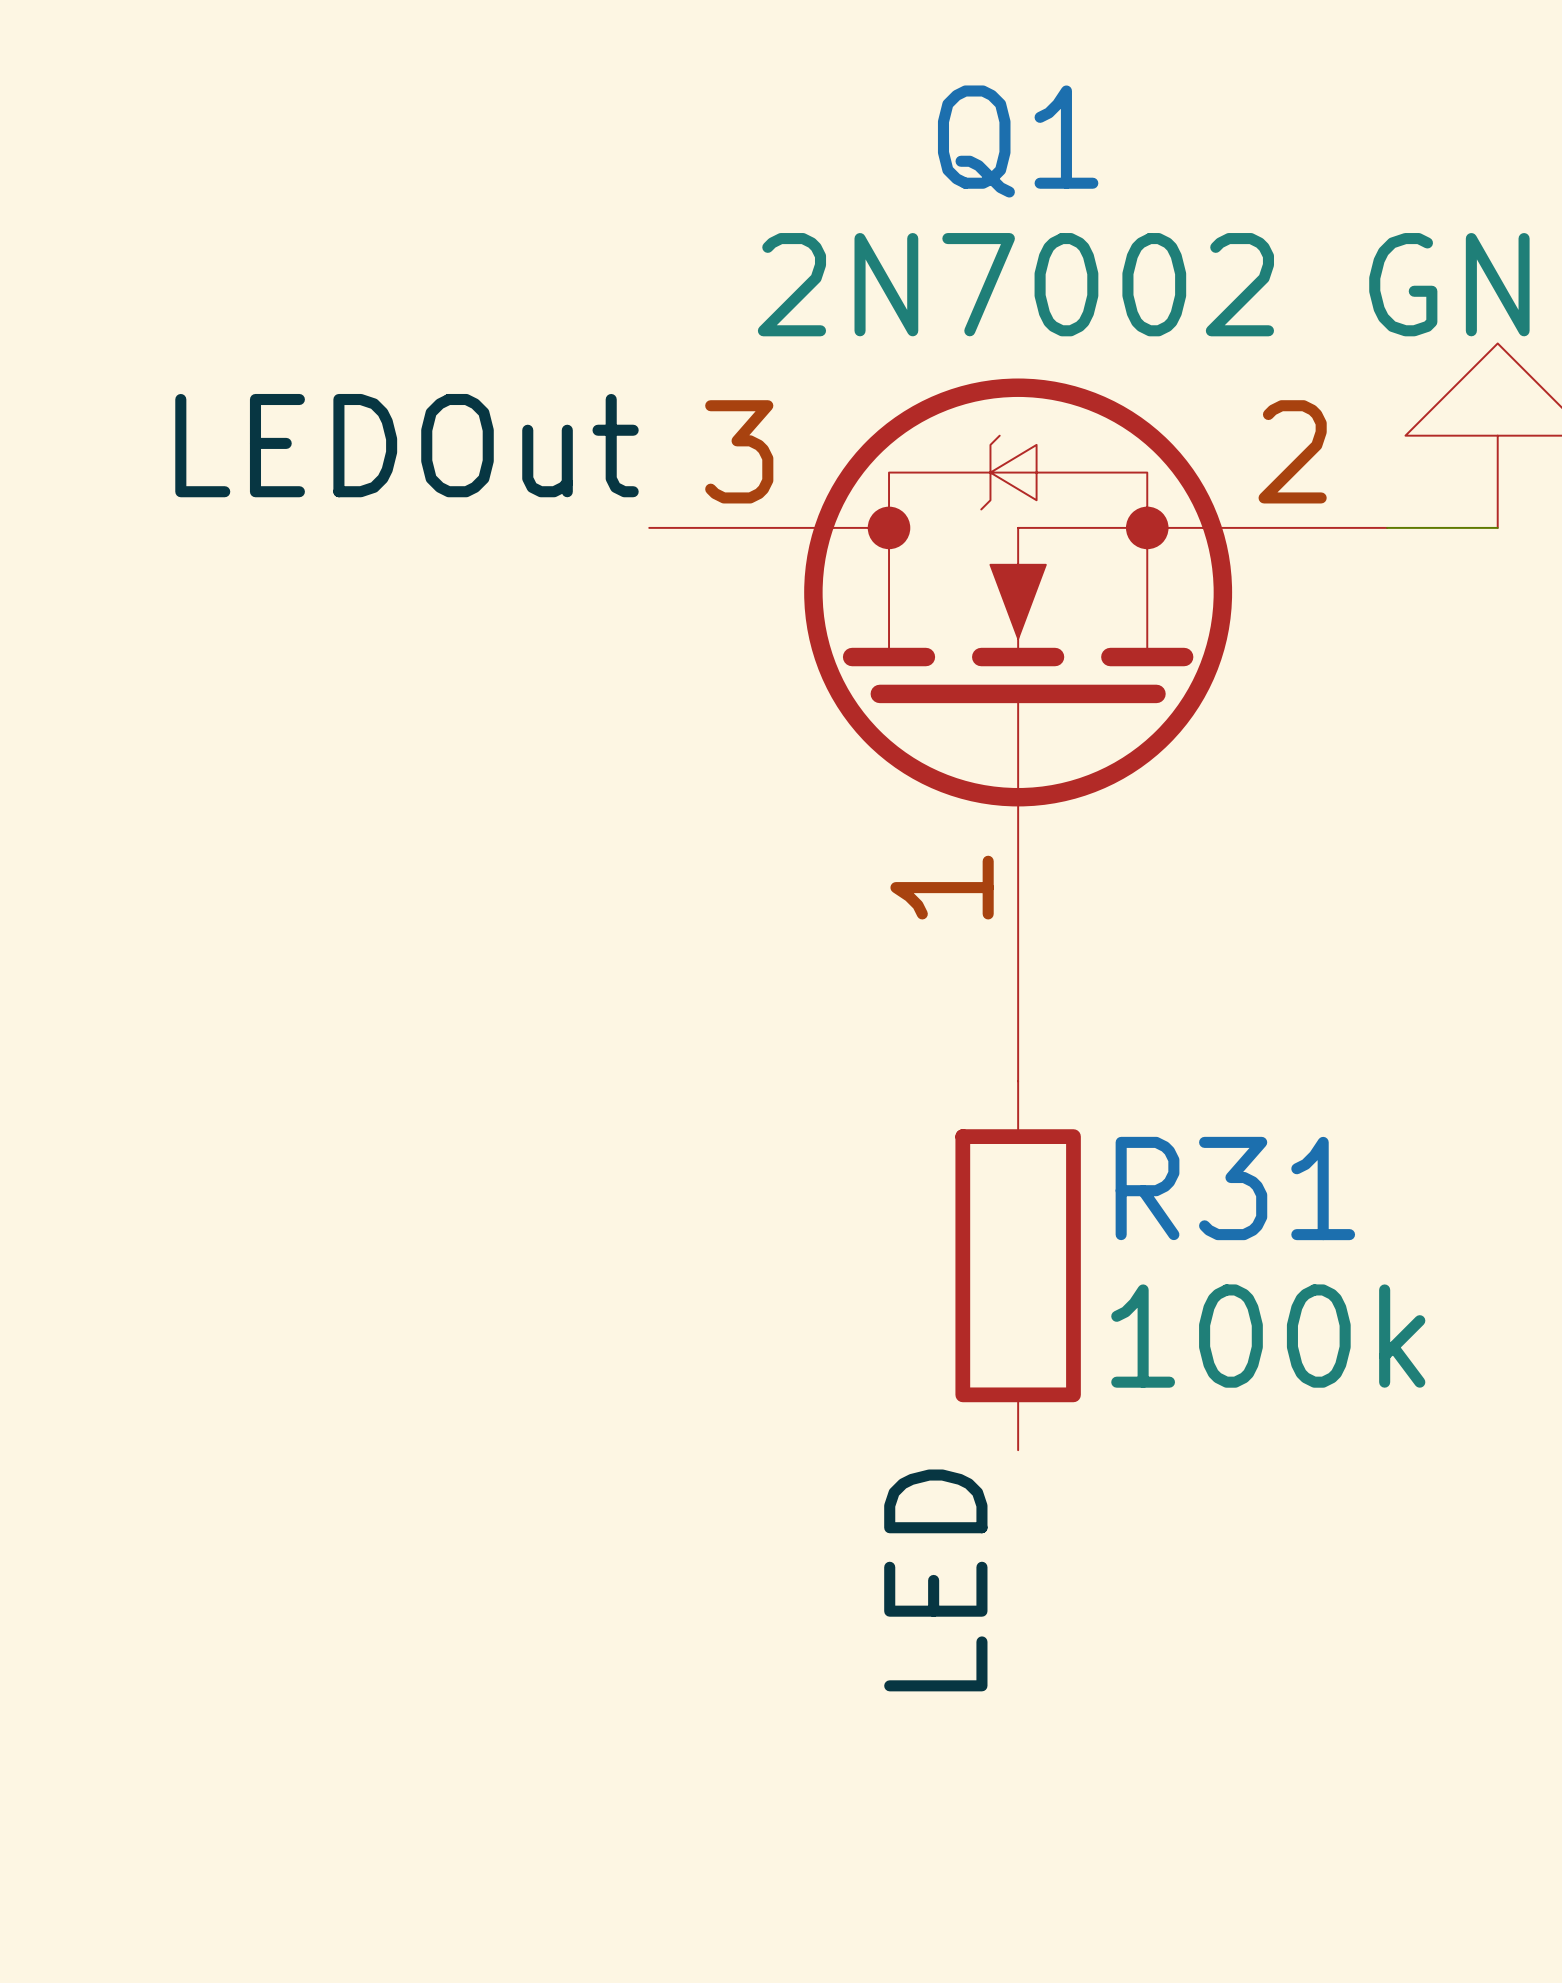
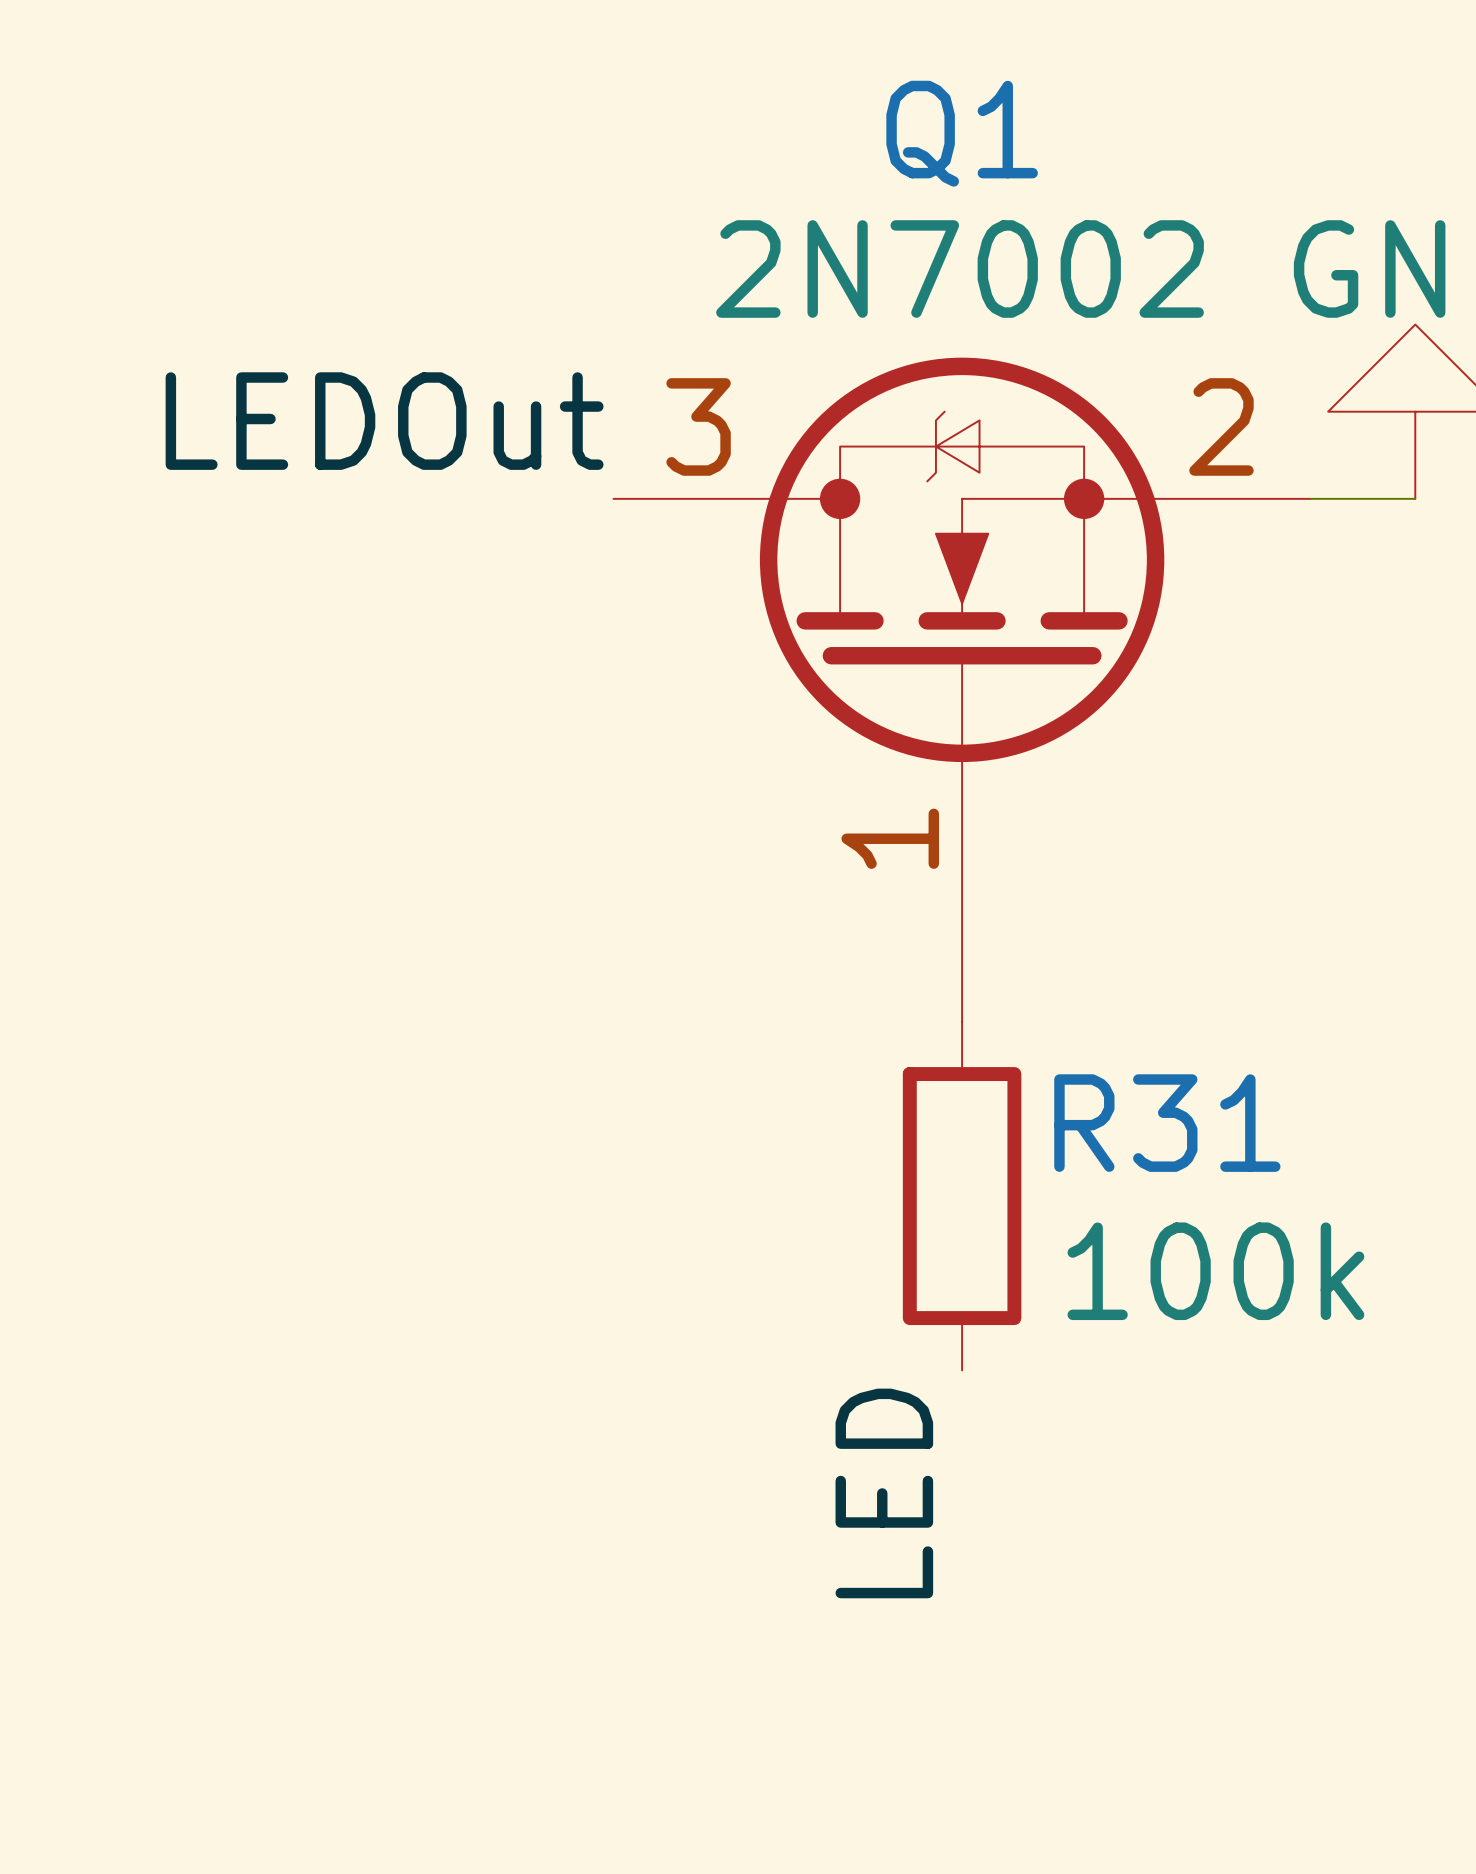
R31 value position: 100k (1268, 1336) -> 100k (1215, 1271)

